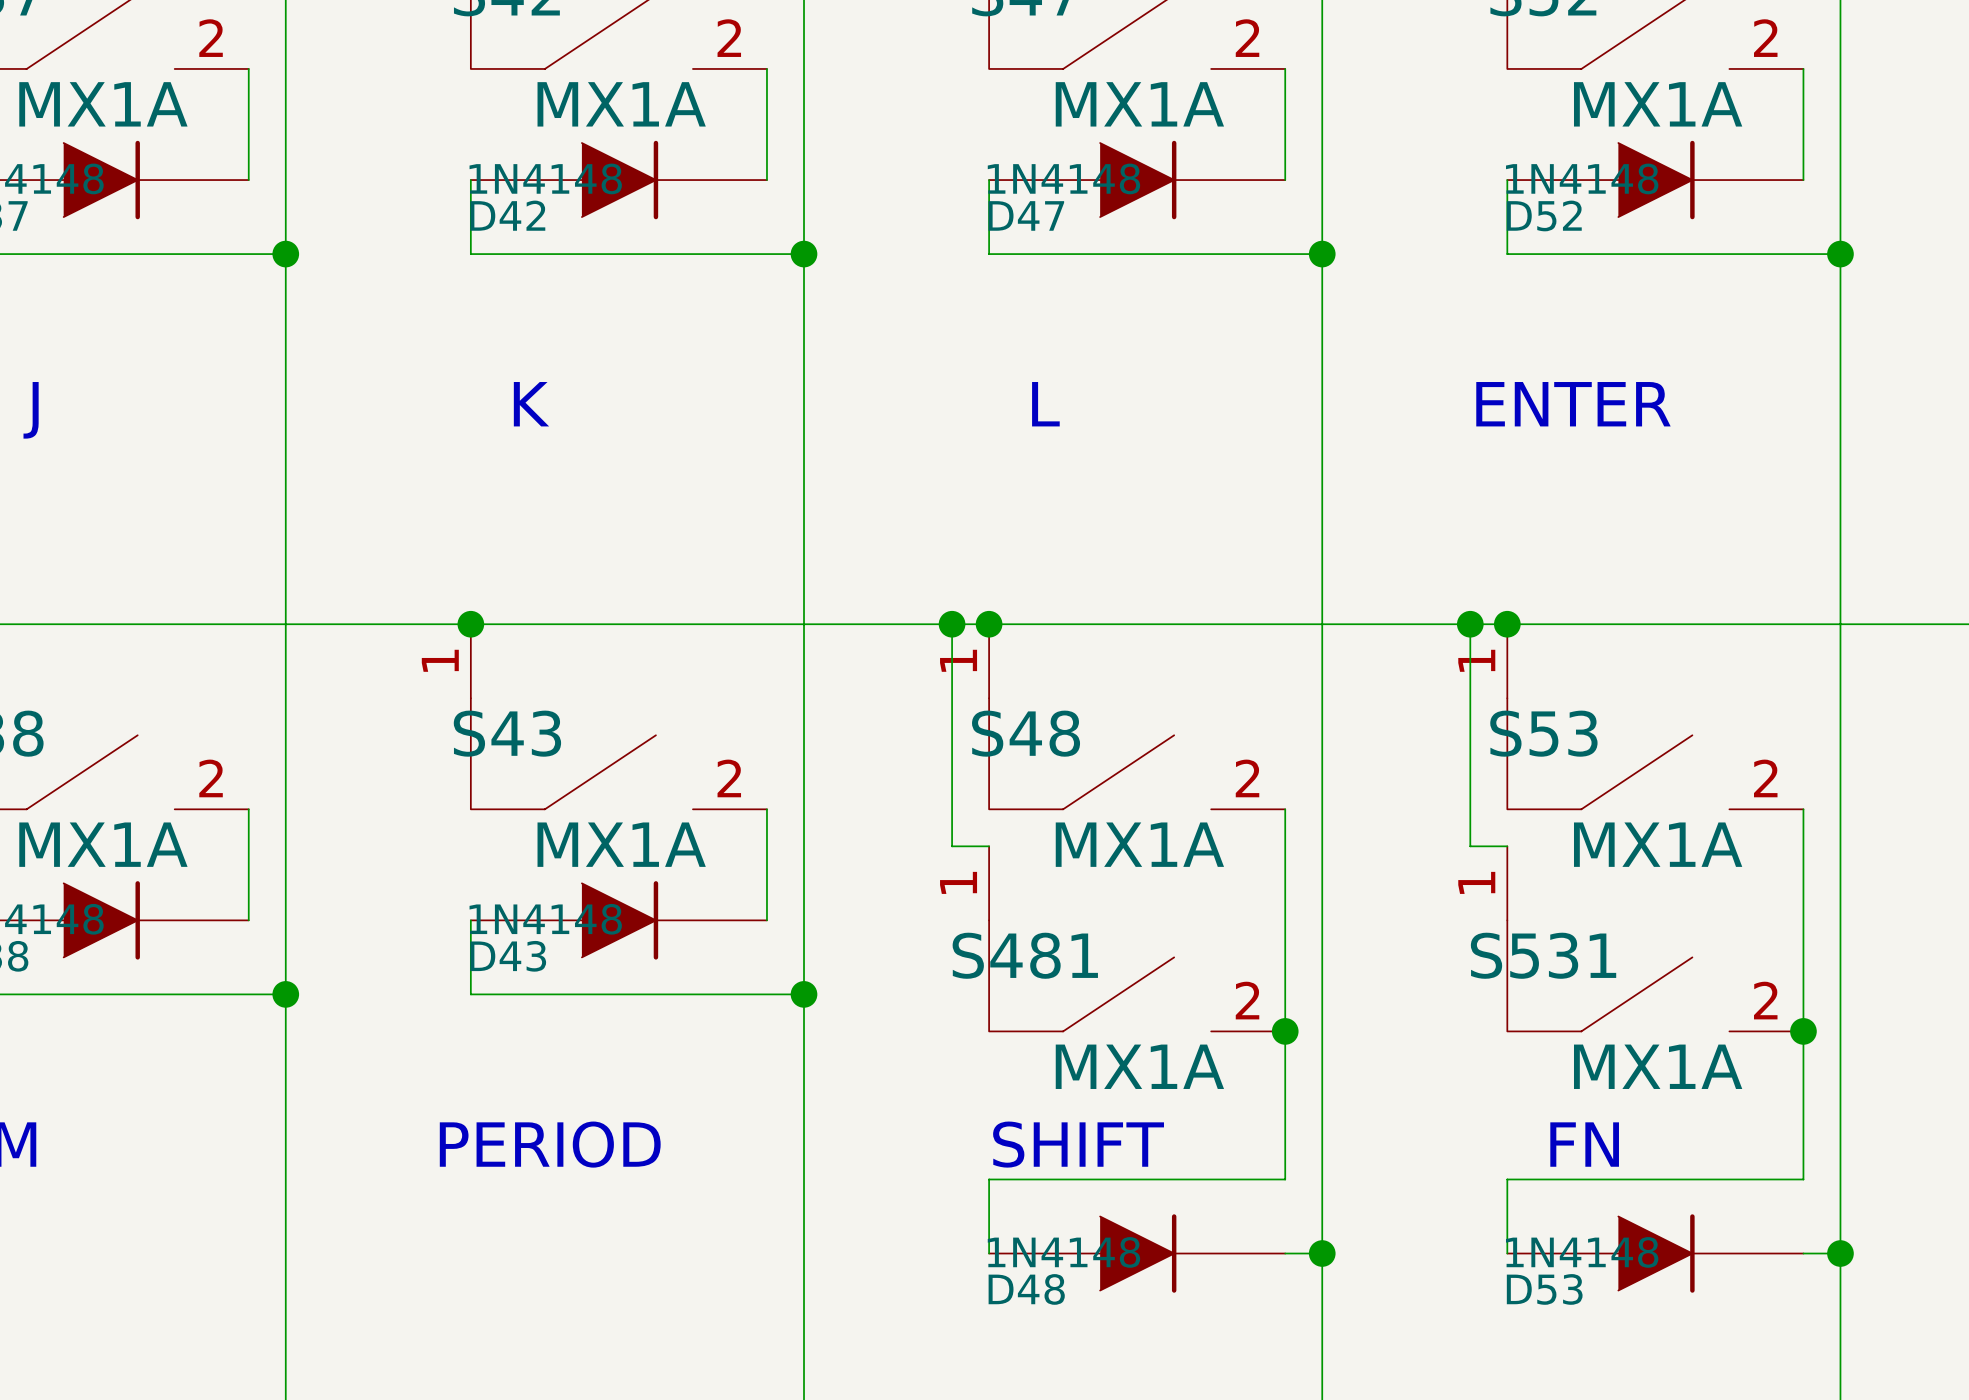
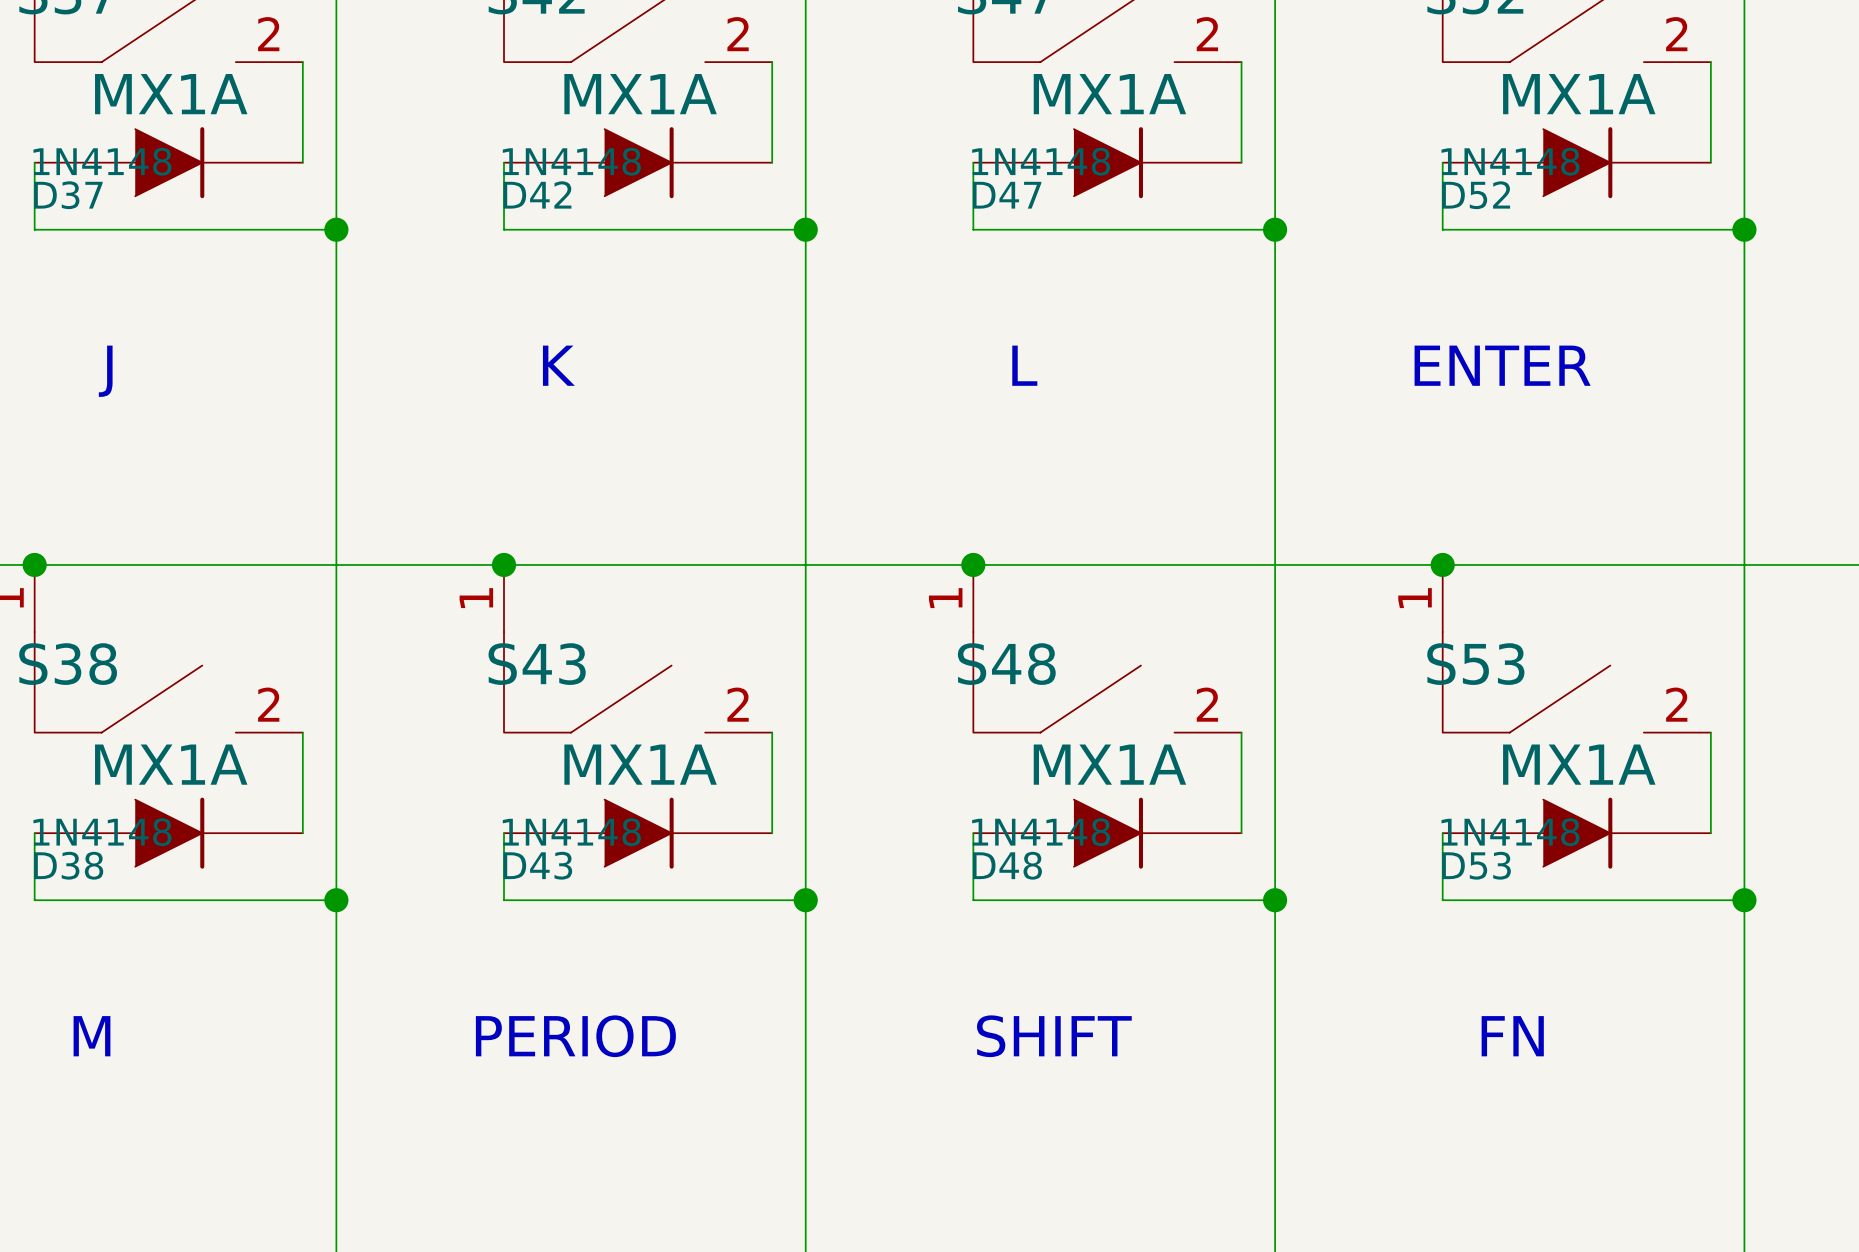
wire: (952, 624) (952, 846) (989, 846) -> none
junction: (952, 624) -> none
wire: (1470, 624) (1470, 846) (1507, 846) -> none
junction: (1470, 624) -> none
wire: none -> (973, 833) (973, 900) (1275, 900)
wire: (1285, 920) (1285, 1179) (989, 1179) (989, 1253) -> none
wire: none -> (1442, 833) (1442, 900) (1744, 900)
wire: (1803, 920) (1803, 1179) (1507, 1179) (1507, 1253) -> none
S481: MX1A (1137, 938) -> none
S531: MX1A (1655, 938) -> none
junction position: (1285, 1031) -> (1275, 900)
junction position: (1803, 1031) -> (1744, 900)
D48 position: (1137, 1253) -> (1107, 833)
wire: (1285, 1253) (1322, 1253) -> none
junction: (1322, 1253) -> none
D53 position: (1655, 1253) -> (1576, 833)
wire: (1803, 1253) (1840, 1253) -> none
junction: (1840, 1253) -> none

